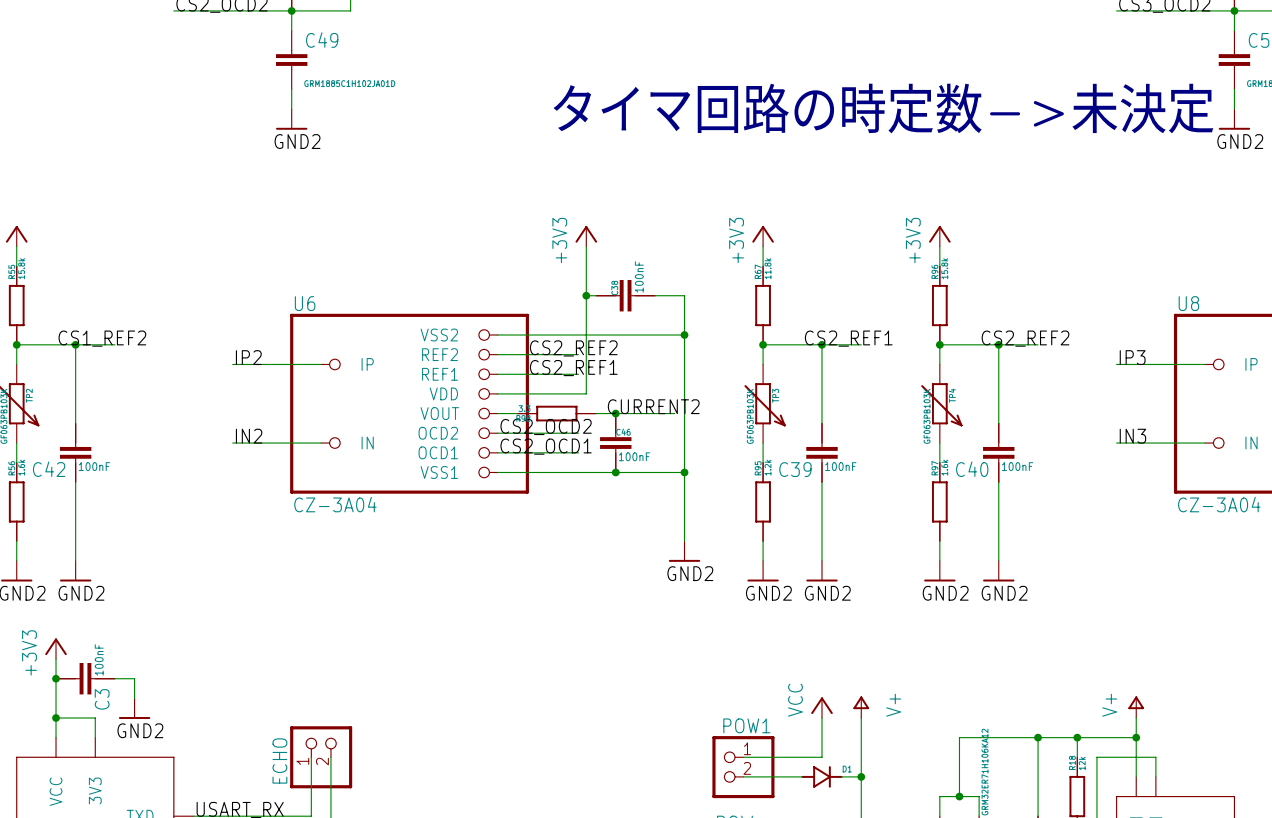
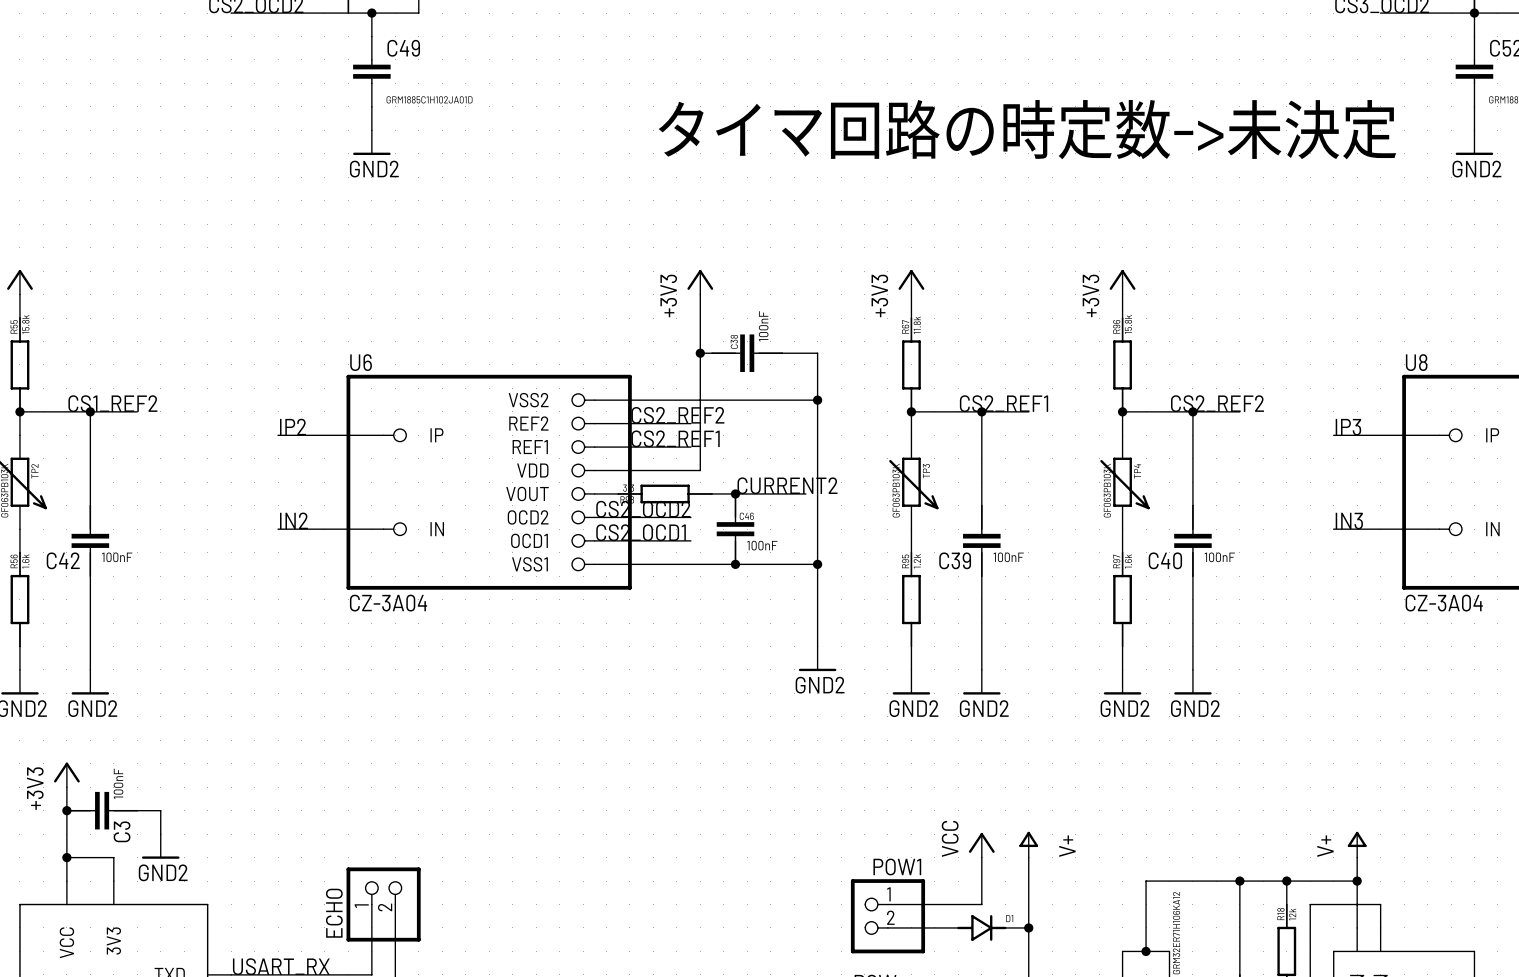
wire: (173, 10) (193, 10) -> none
wire: (291, 10) (291, 30) -> (371, 13) (371, 36)
junction position: (291, 10) -> (371, 13)
wire: (1116, 10) (1155, 10) -> none
C49 position: (291, 60) -> (371, 71)
wire: (291, 89) (291, 109) -> (371, 106) (371, 130)
power symbol position: (291, 119) -> (371, 142)
label position: GND2 (297, 141) -> GND2 (374, 169)

